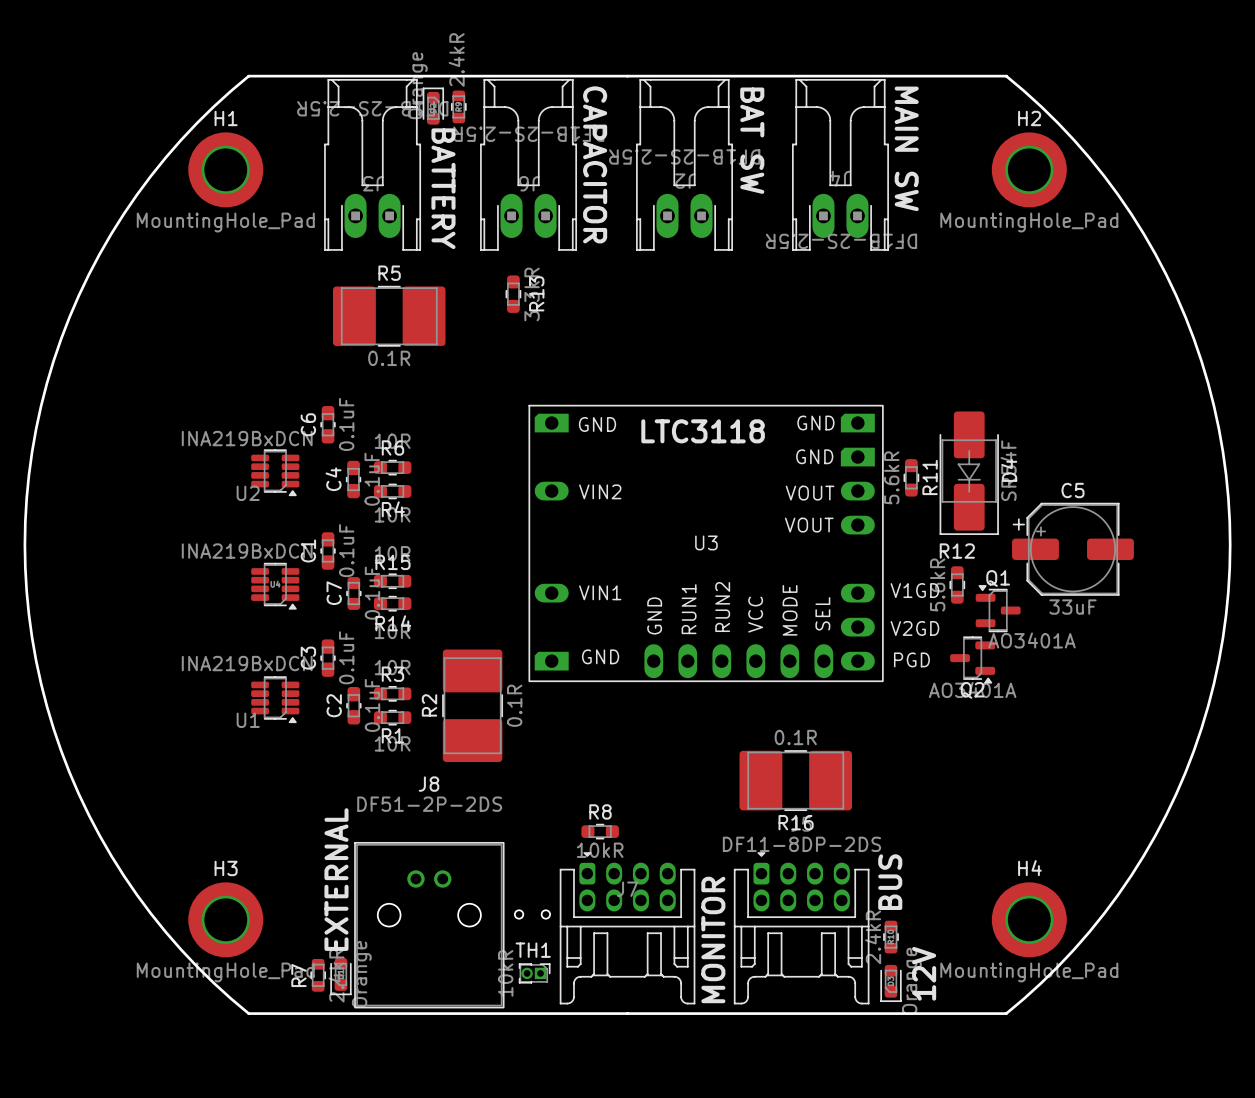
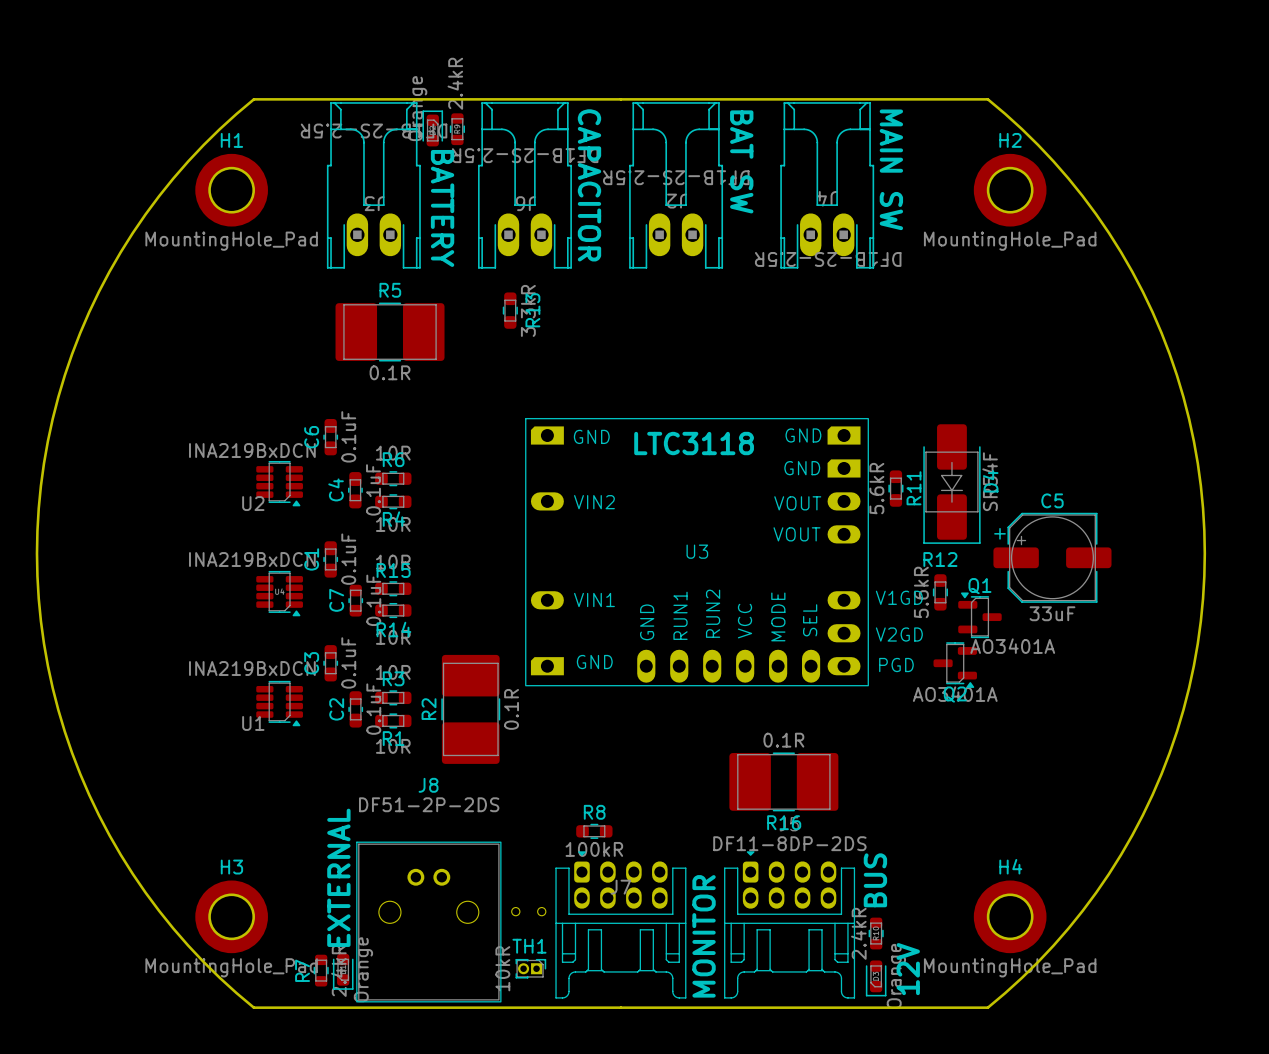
R8 value: 10kR (600, 850) -> 100kR (594, 849)

